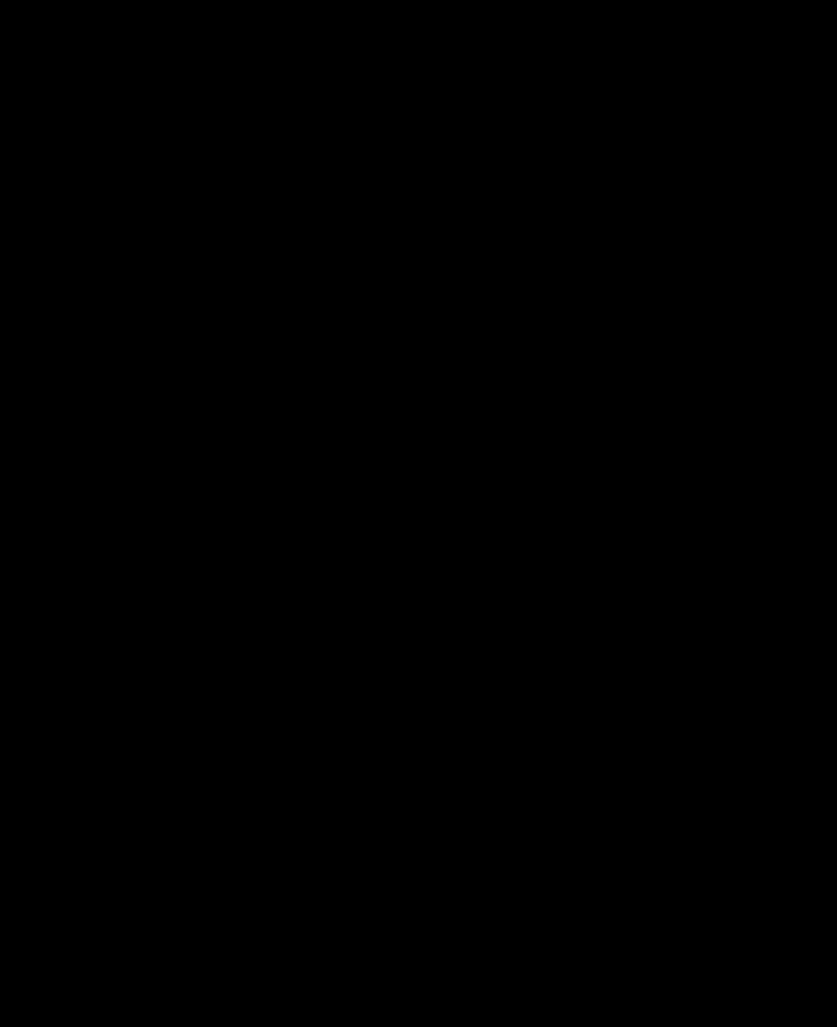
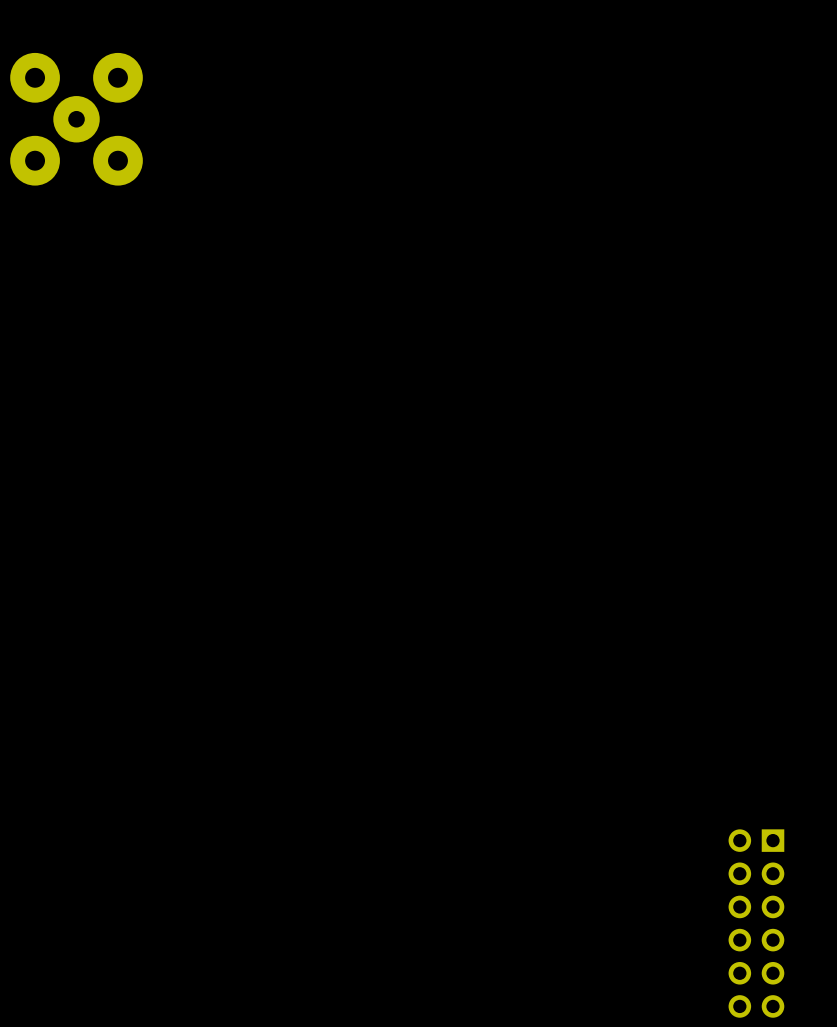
part: none -> (76, 119)
part: none -> (756, 923)

